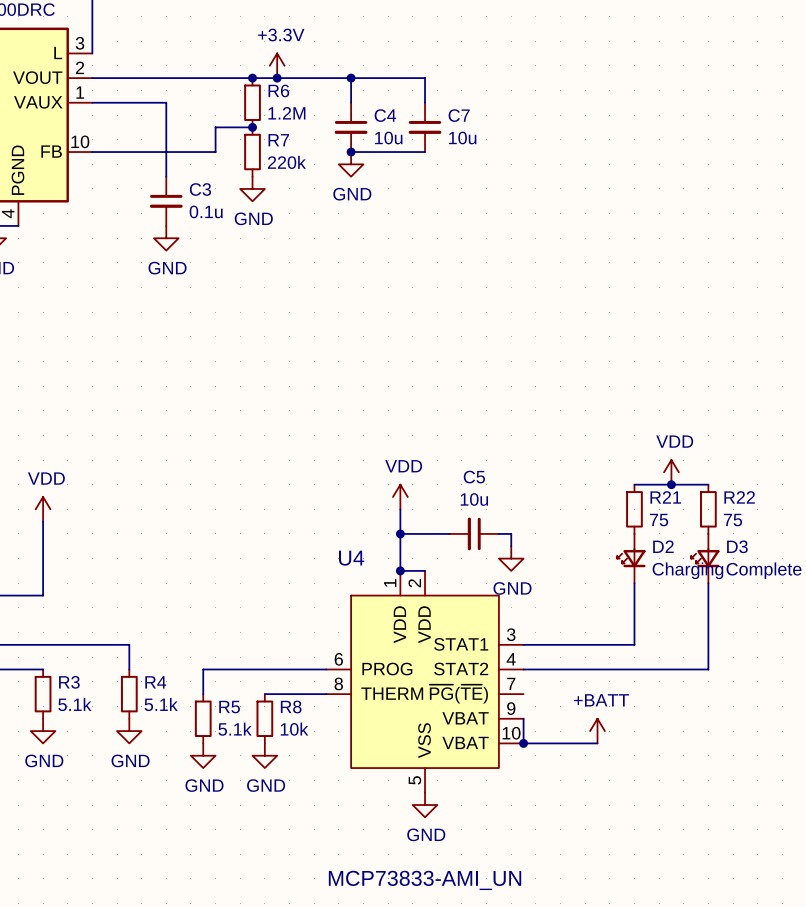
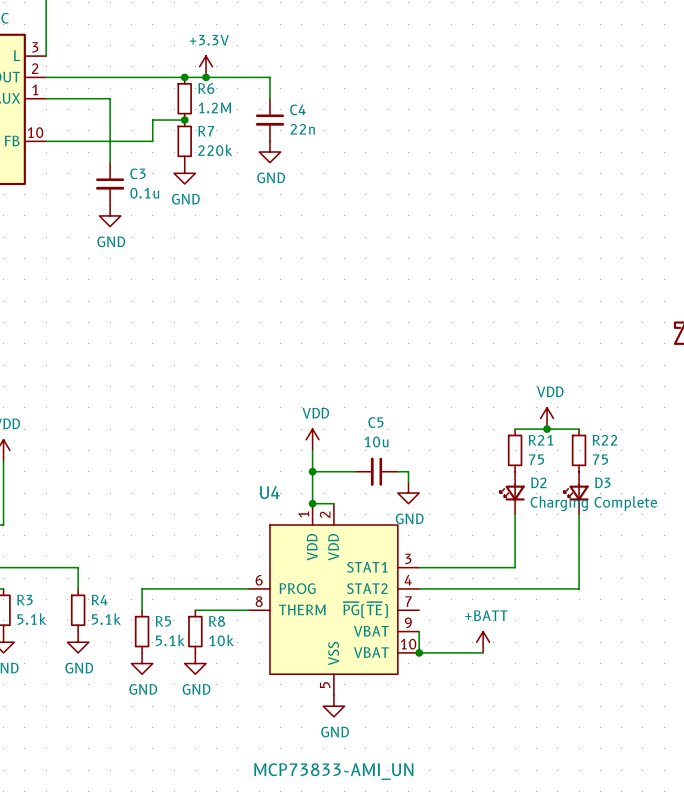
wire: (351, 78) (425, 78) (425, 102) -> none
junction: (351, 78) -> none
C7: 10u (425, 127) -> none
C4 value: 10u (388, 138) -> 22n (302, 129)
wire: (351, 152) (425, 152) -> none
junction: (351, 152) -> none

